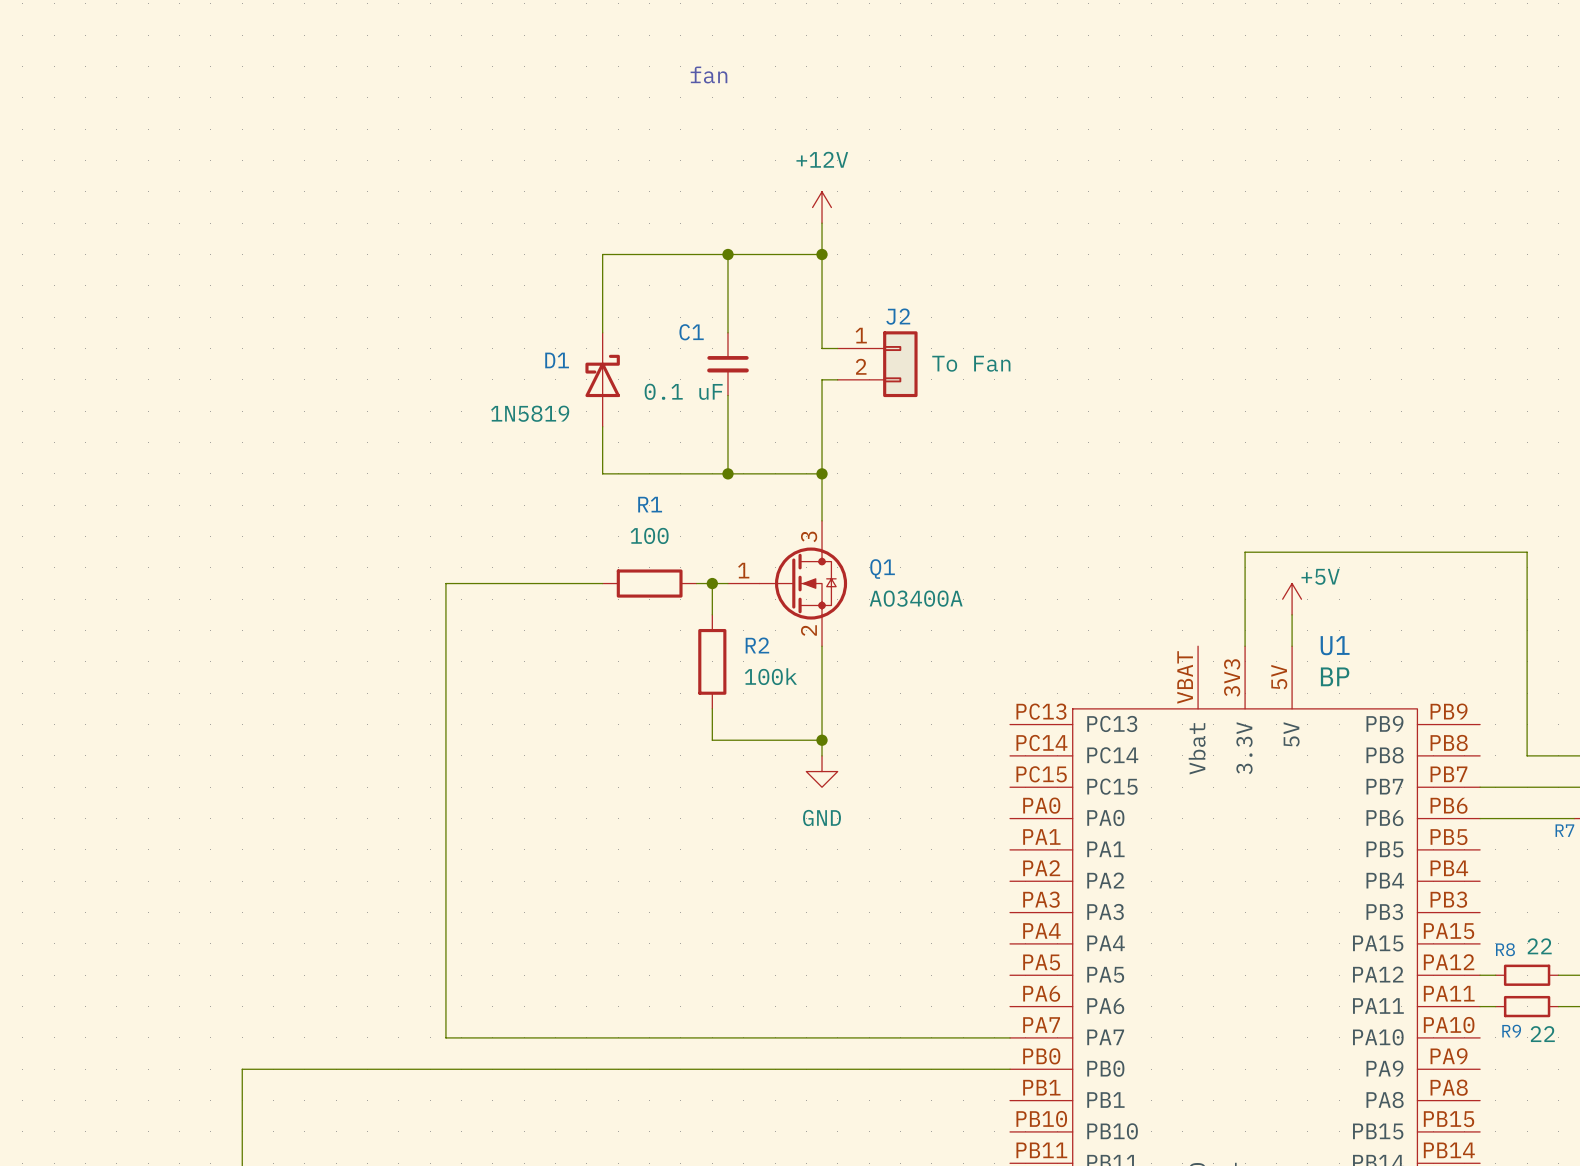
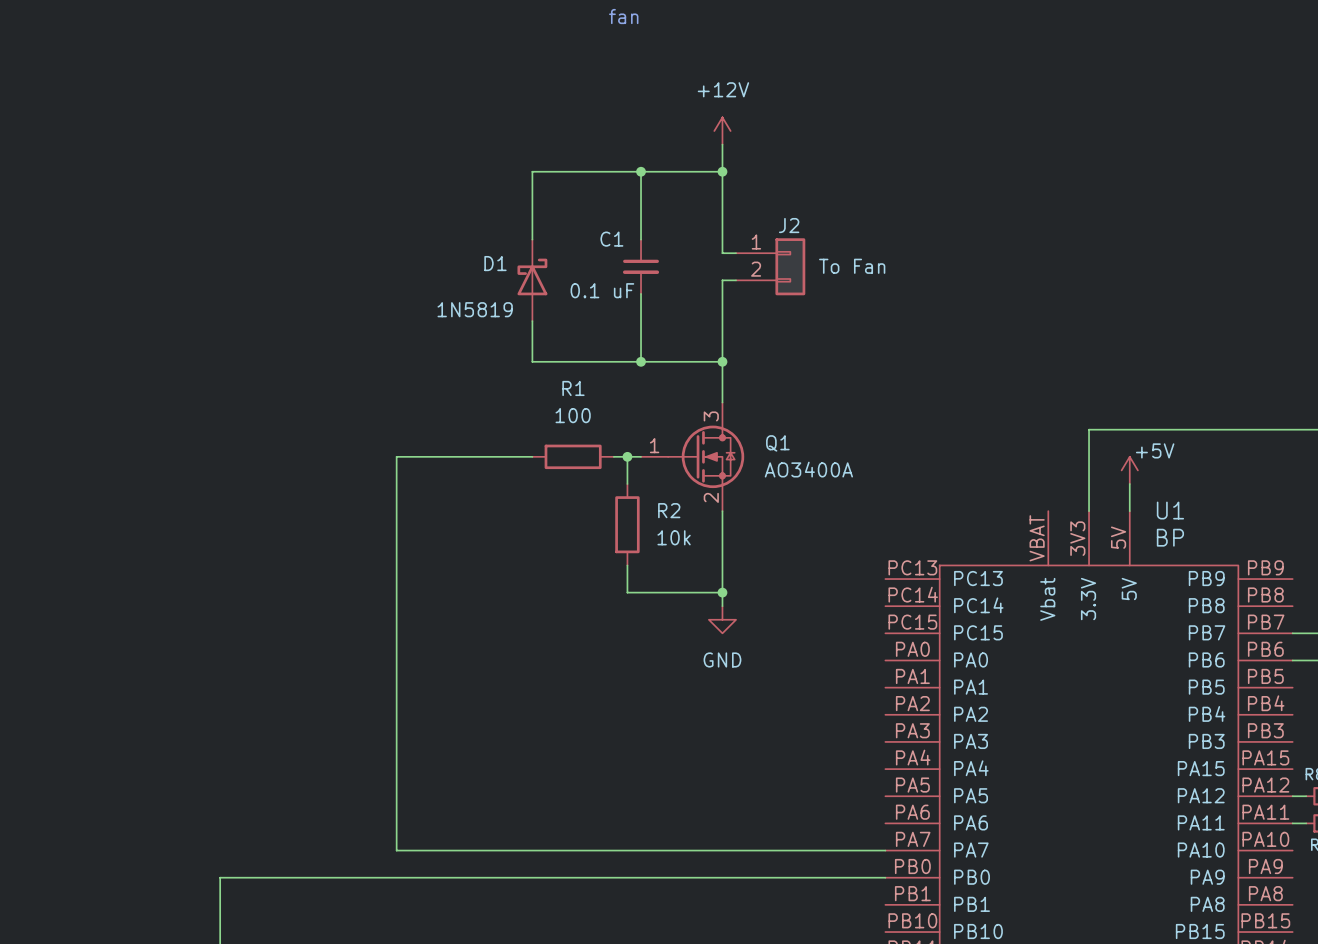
R2 value: 100k (770, 676) -> 10k (674, 537)

